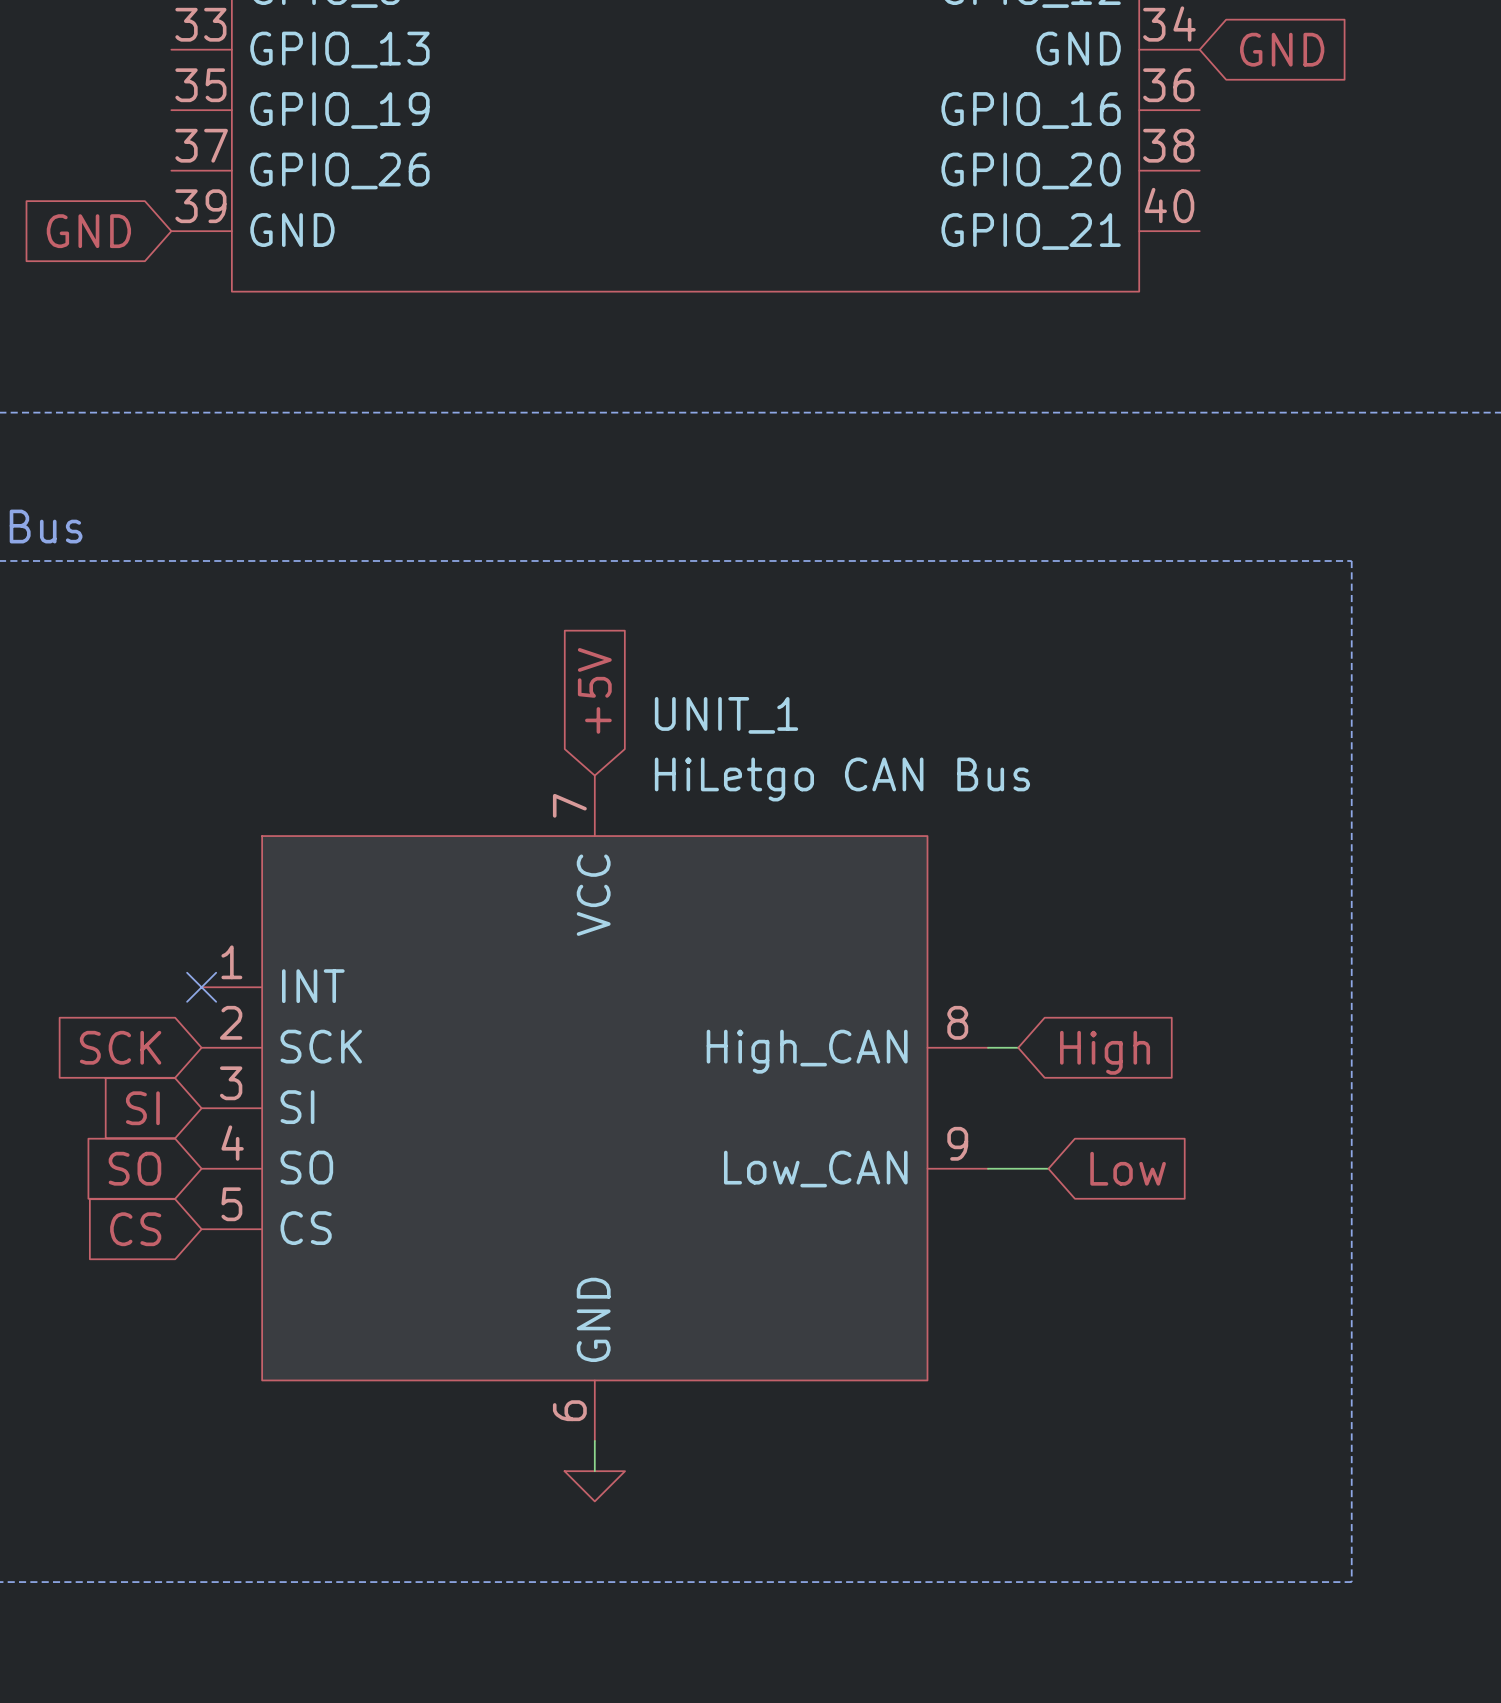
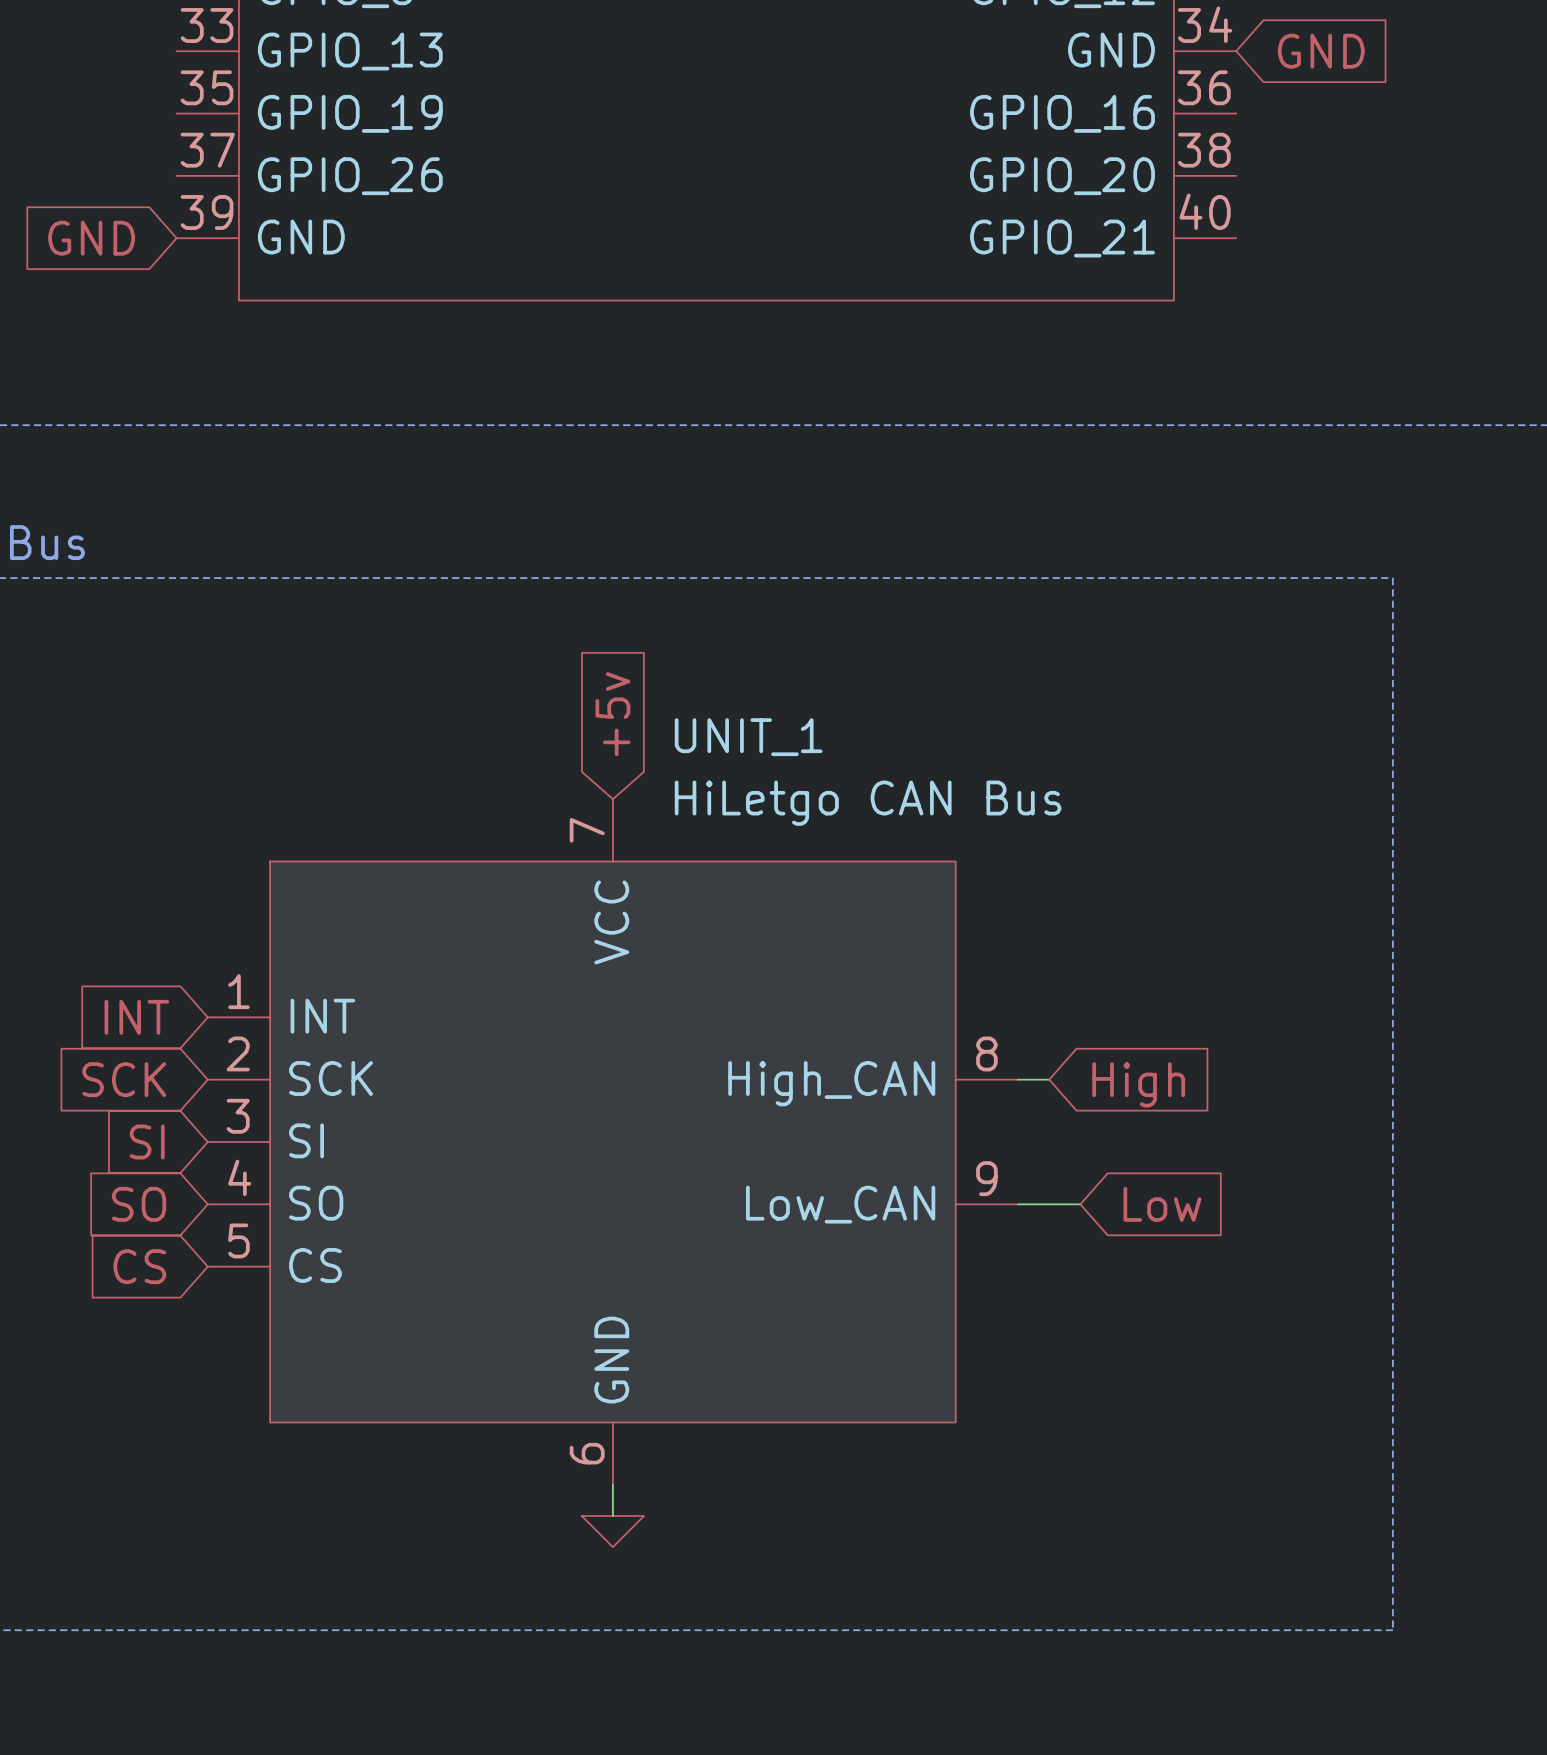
global label: +5V (594, 690) -> +5v (612, 714)
global label: none -> INT (136, 1017)
no-connect mark: (201, 987) -> none

